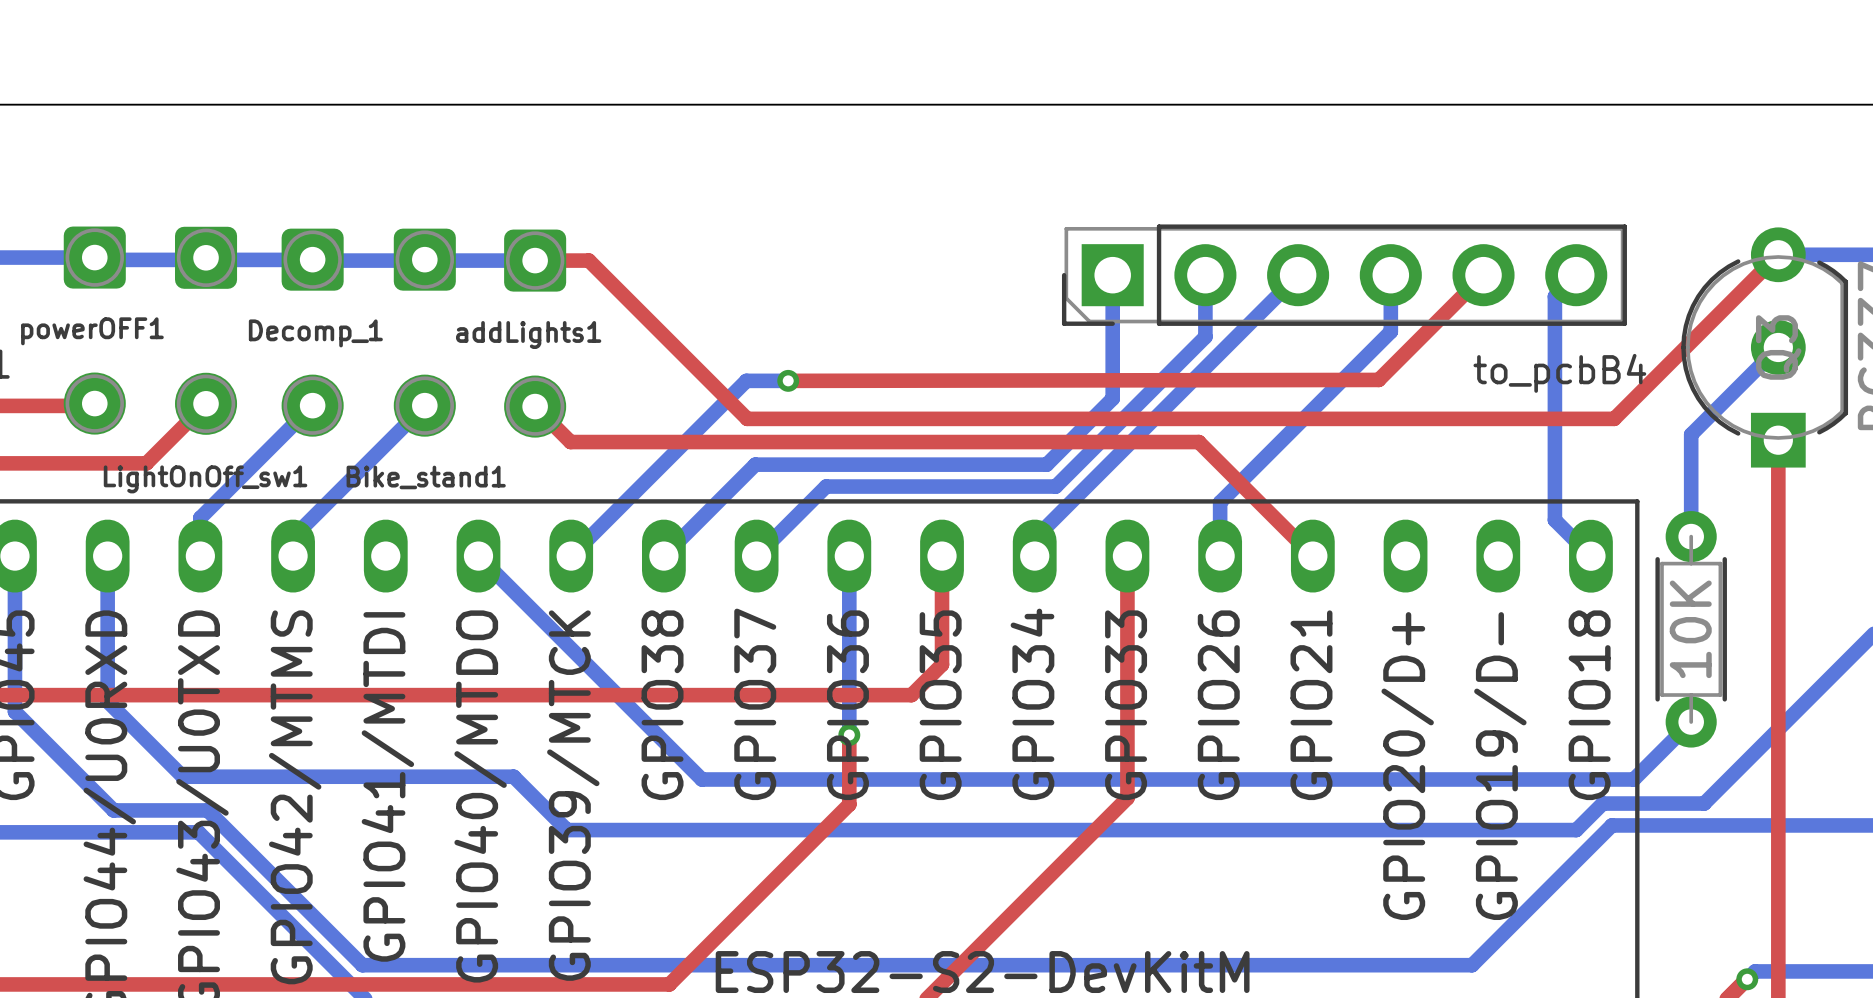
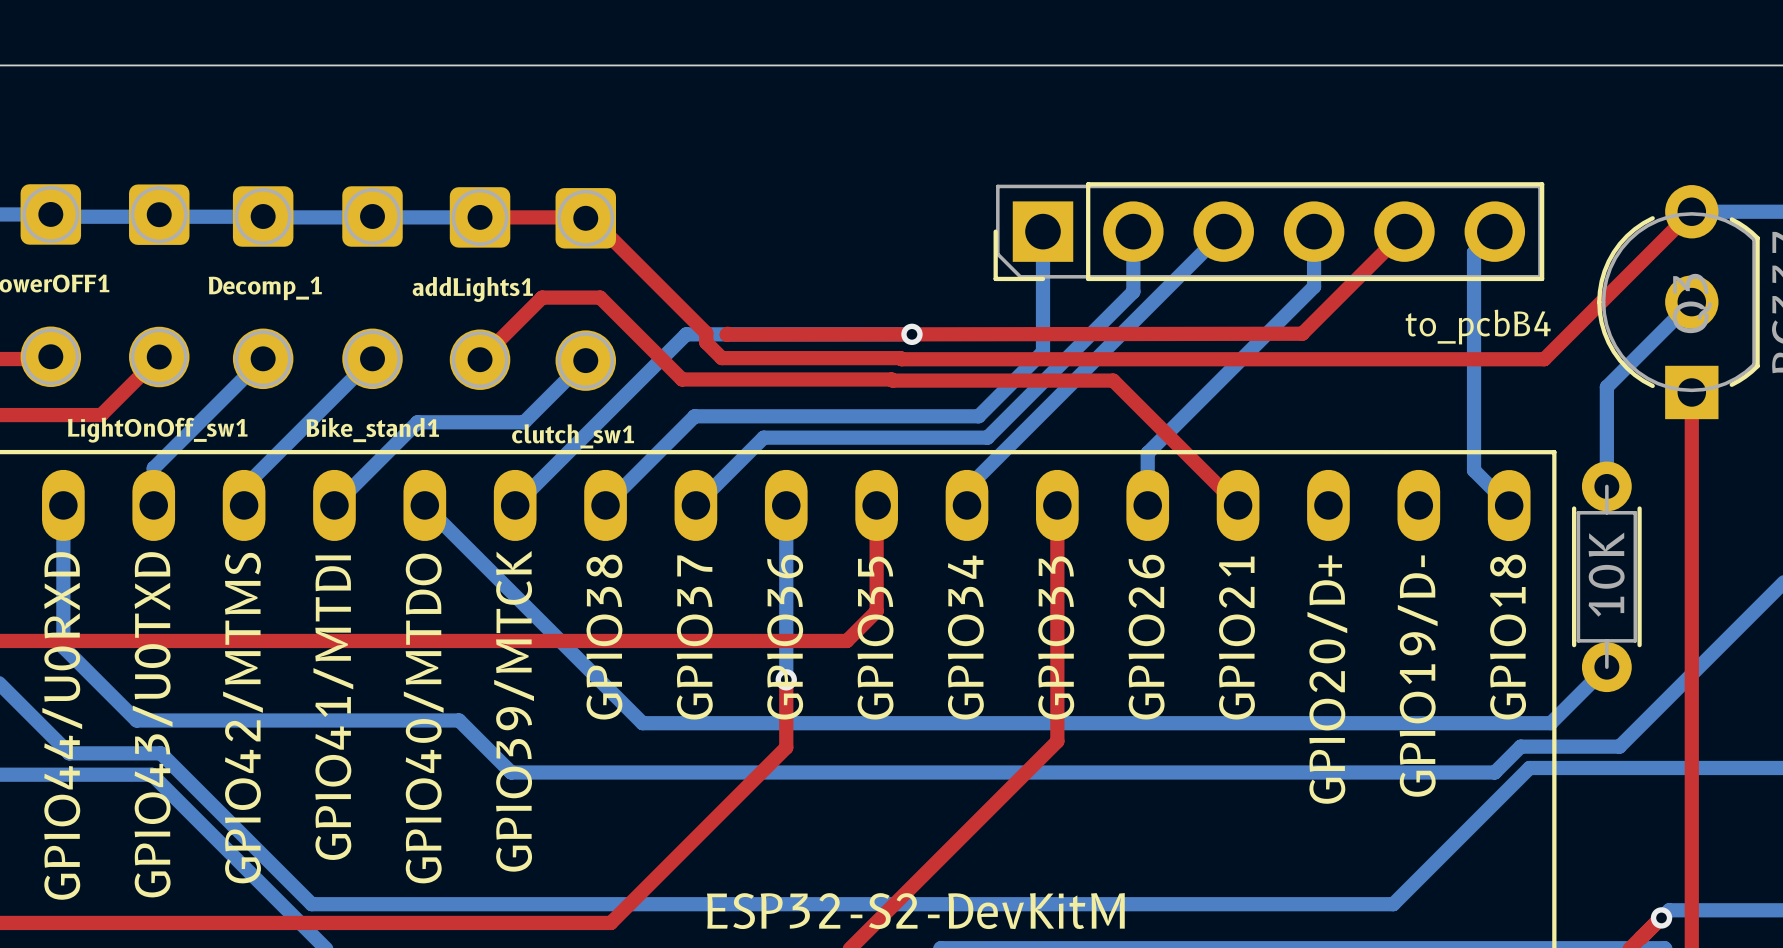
top track: (588, 260) (747, 418) (1614, 418) (1627, 406) -> (532, 217) (590, 217) (706, 333) (706, 342) (721, 358) (1544, 359)
clutch_sw1: none -> (585, 289)
via position: (788, 380) -> (911, 334)
top track: (535, 406) (570, 442) (1198, 442) -> (480, 359) (542, 297) (600, 297) (682, 379) (1113, 380) (1126, 394)
bottom track: none -> (585, 360) (524, 422) (417, 422) (334, 505)

